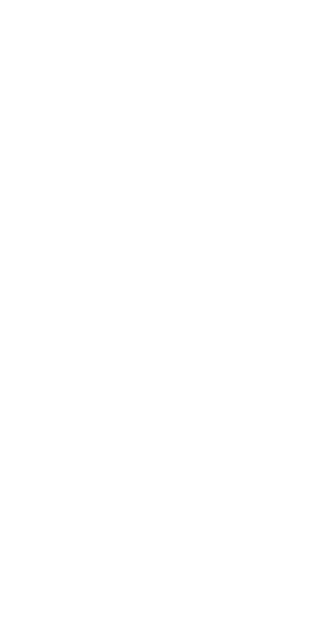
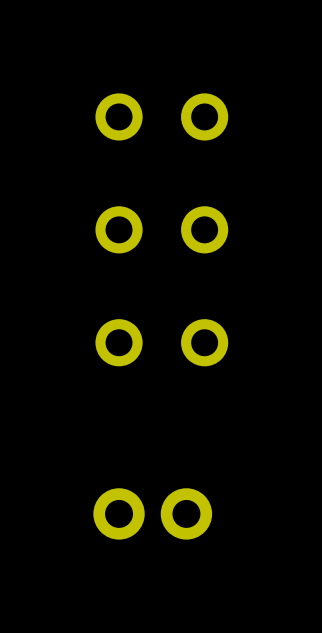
part: none -> (161, 116)
part: none -> (161, 229)
part: none -> (161, 342)
part: none -> (152, 513)

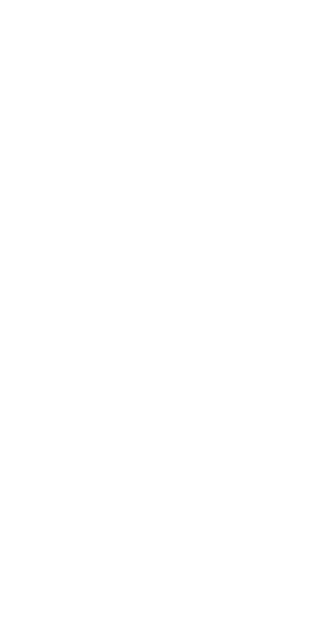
part: (161, 116) -> none
part: (161, 229) -> none
part: (161, 342) -> none
part: (152, 513) -> none

